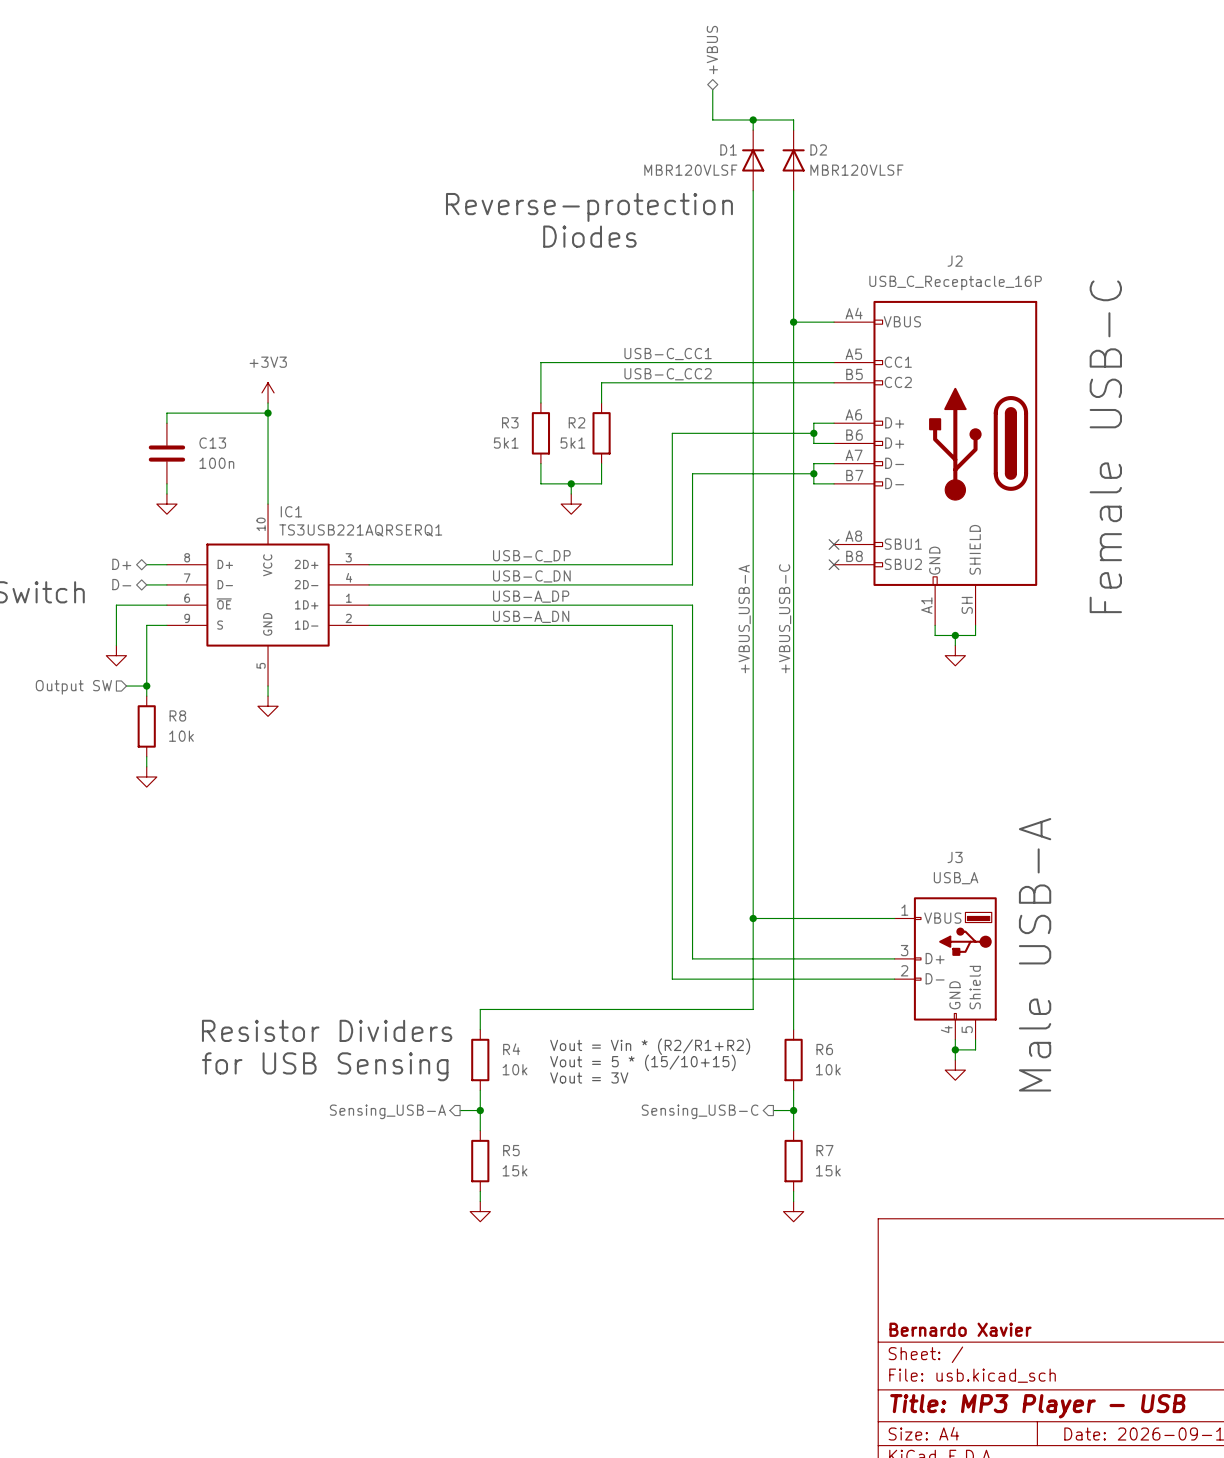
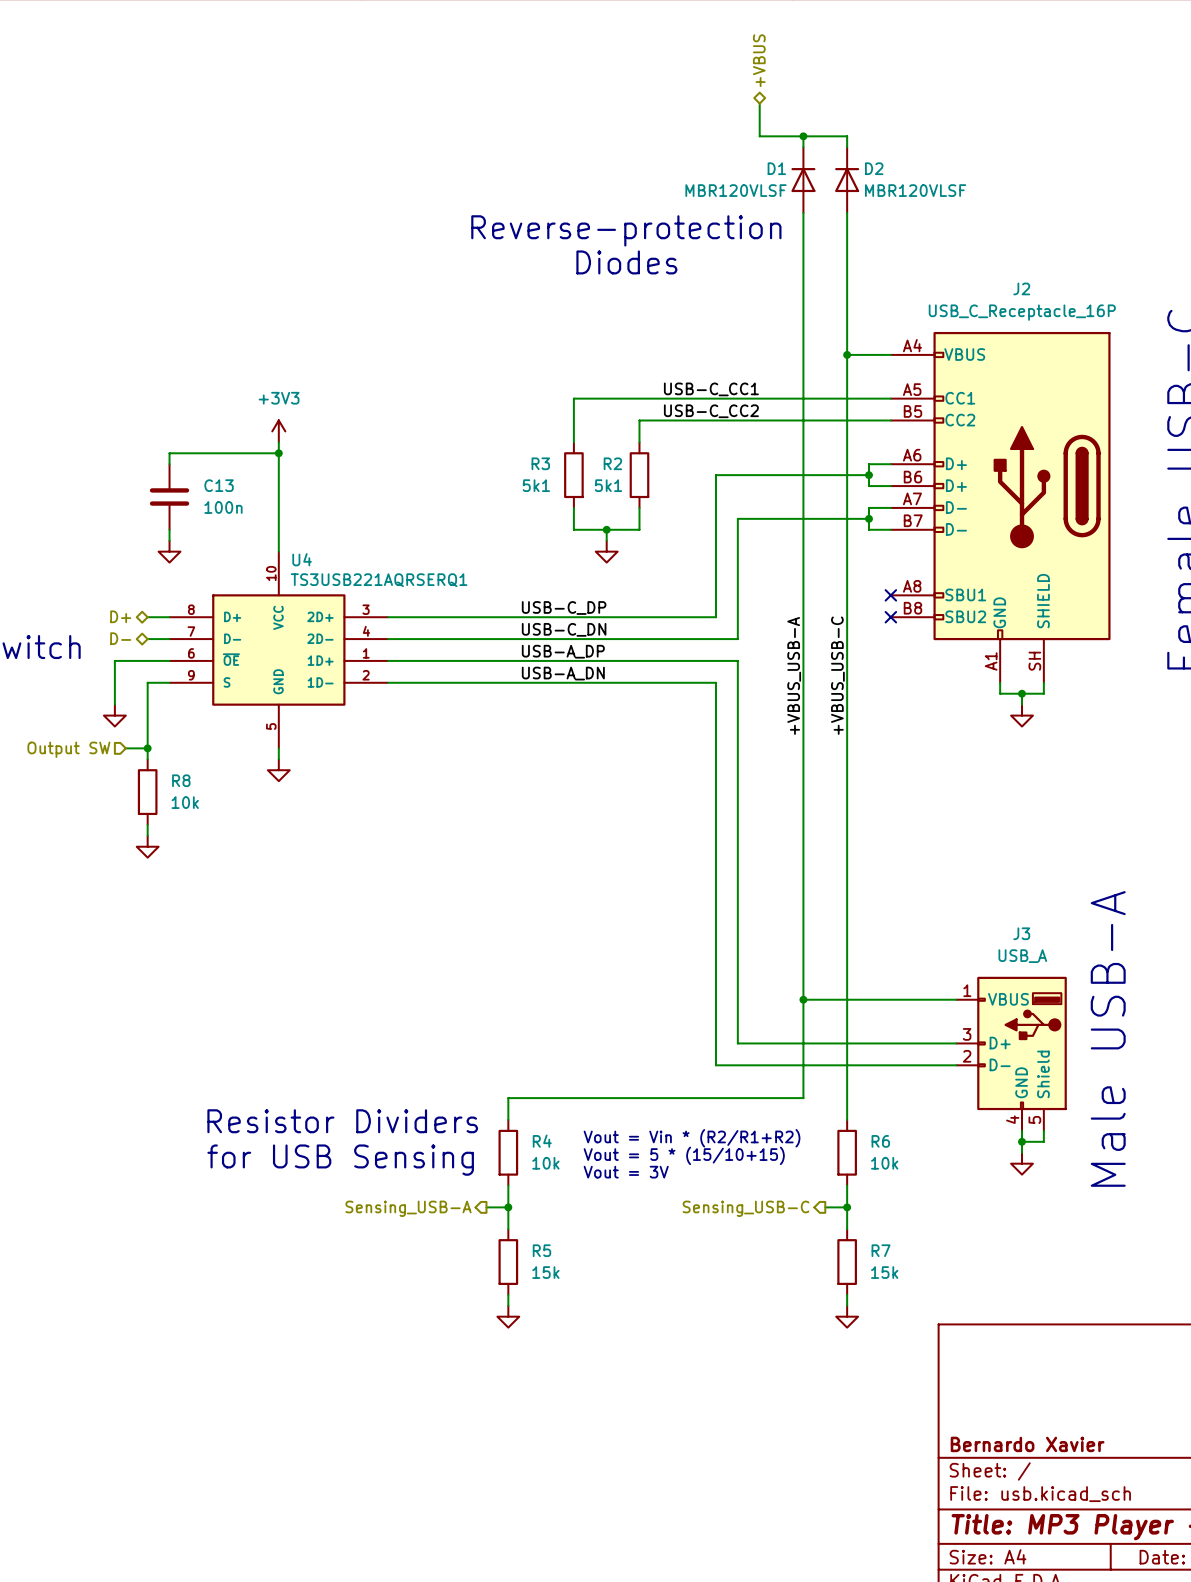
IC1 name: IC1 (291, 511) -> U4 (302, 559)

